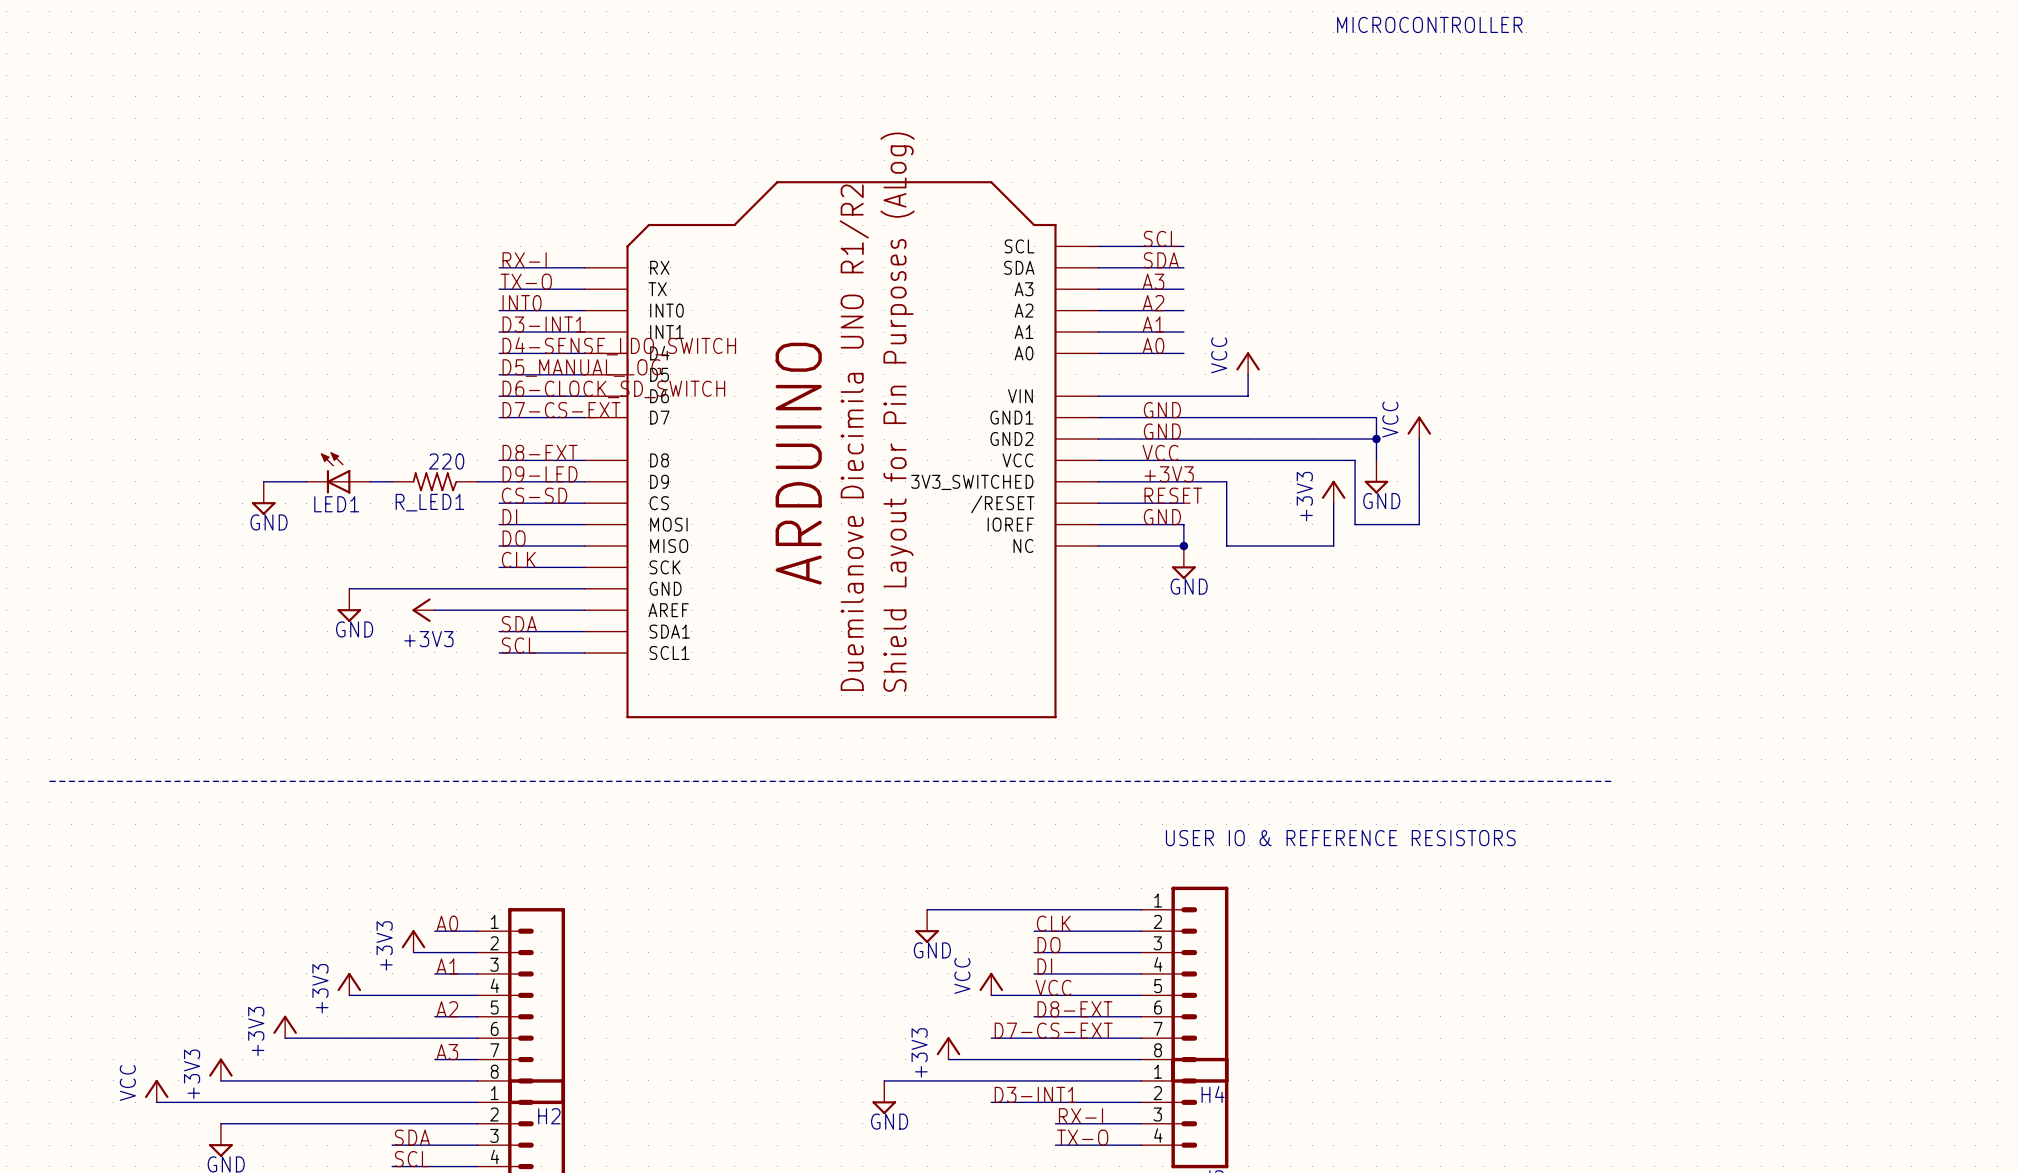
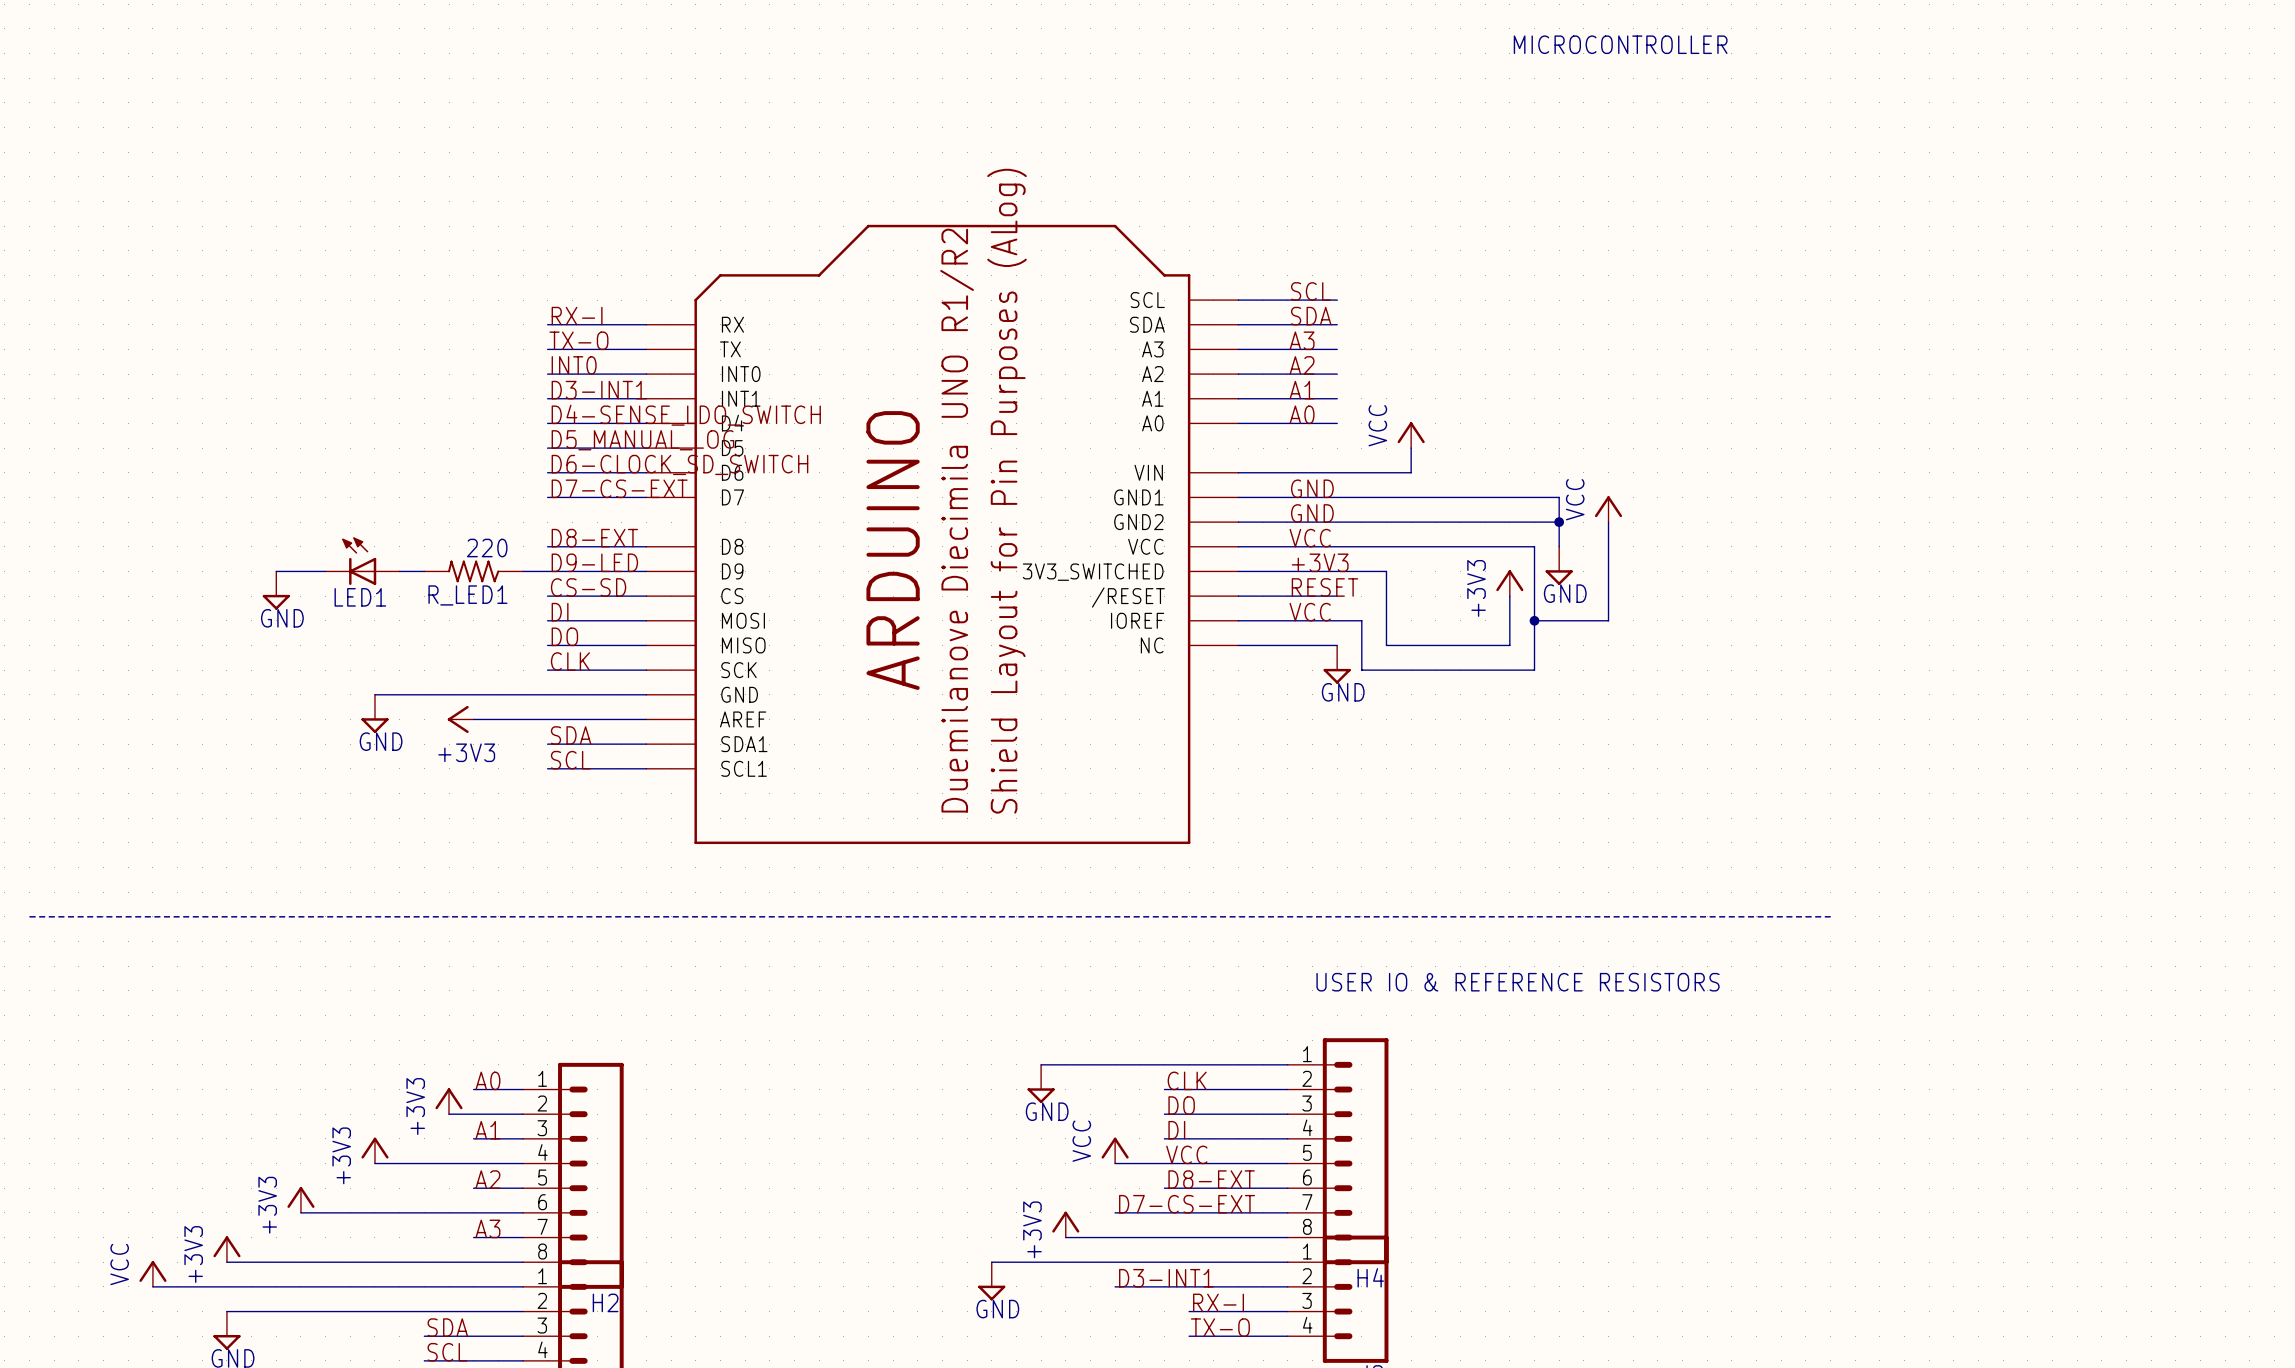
label: GND (1162, 517) -> VCC (1310, 612)
wire: (1183, 524) (1183, 545) -> (1337, 620) (1361, 620) (1361, 670) (1534, 670) (1534, 620)
junction: none -> (1534, 620)
junction: (1183, 545) -> none

